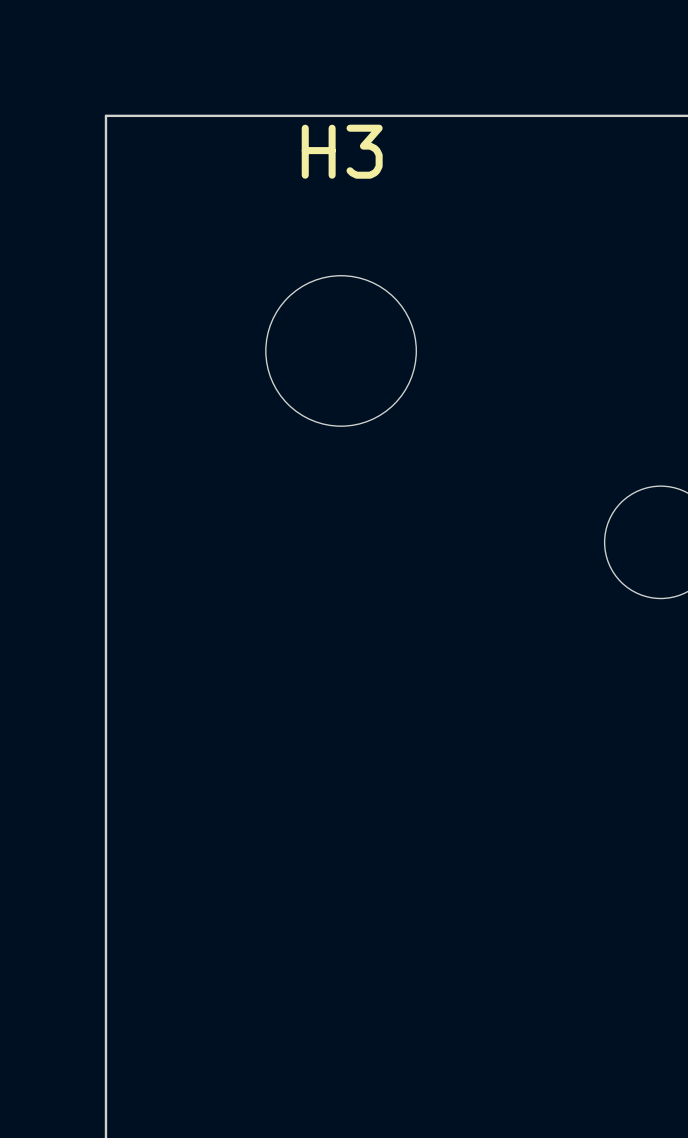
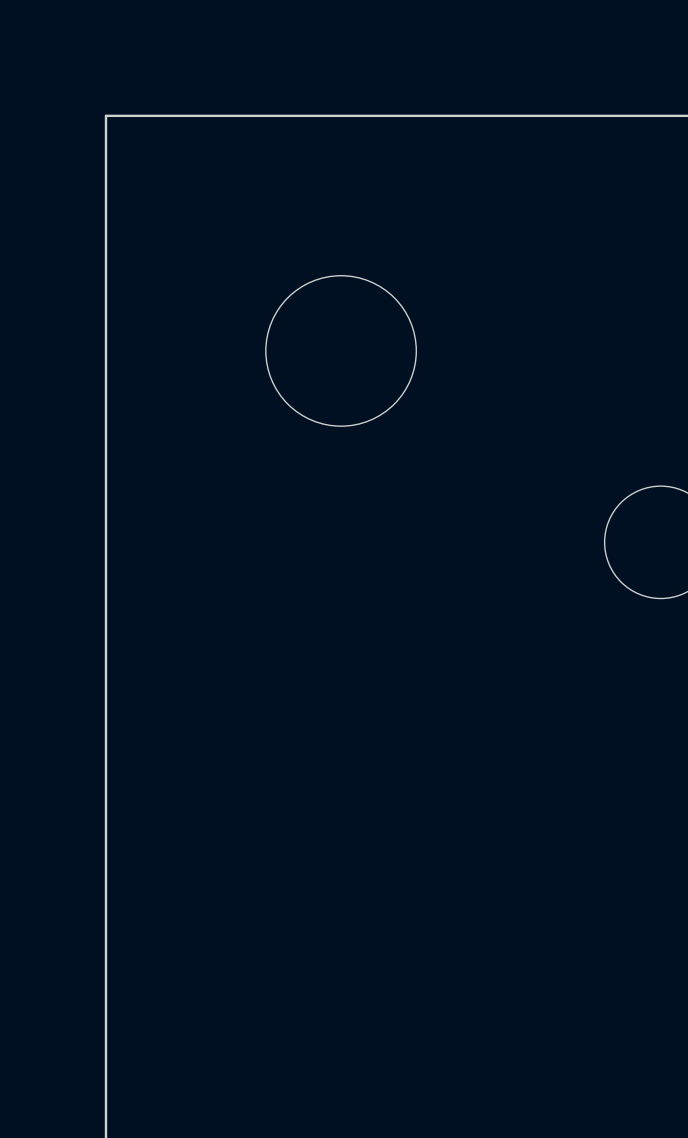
H3 name: H3 (342, 151) -> none

